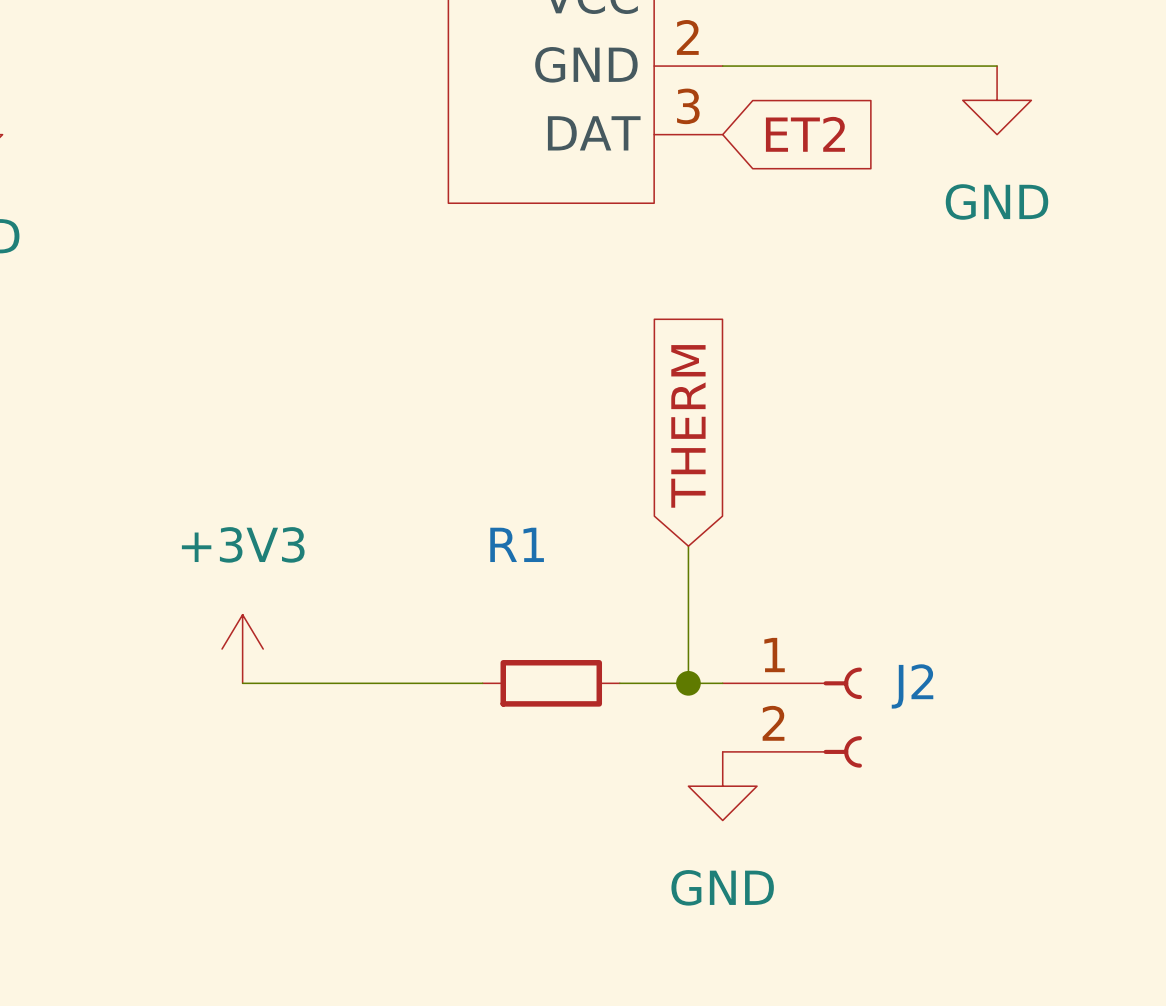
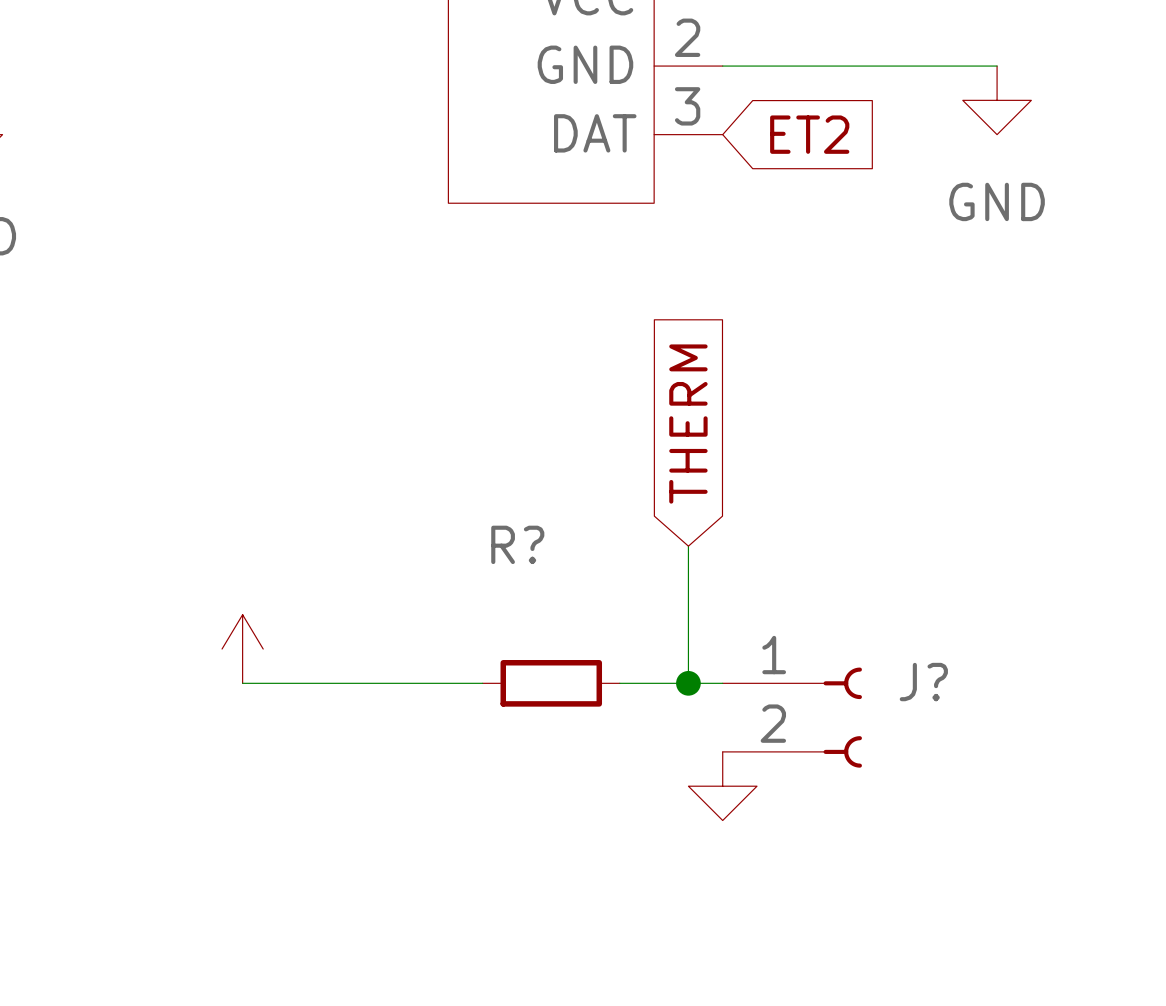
power symbol text: +3V3 (243, 544) -> none
R1 name: R1 (517, 544) -> R? (517, 544)
J2 name: J2 (912, 686) -> J? (923, 682)
power symbol text: GND (722, 887) -> none

